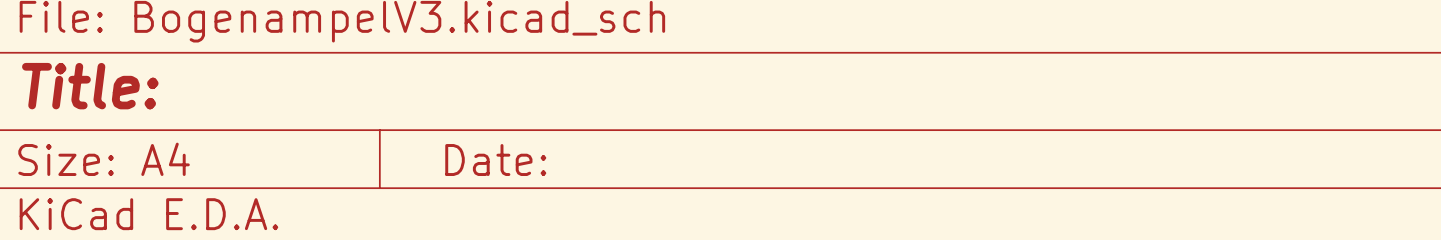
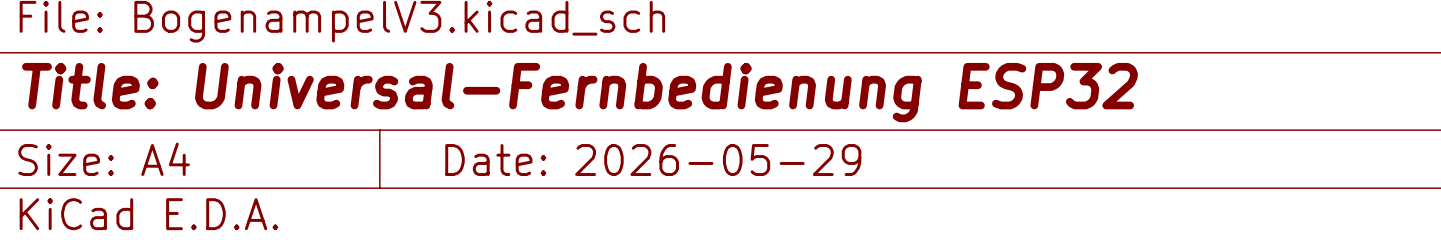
title block: Title: (90, 86) -> Title: Universal-Fernbedienung ESP32 (579, 92)
title block: Date: (495, 160) -> Date: 2026-05-29 (653, 160)

